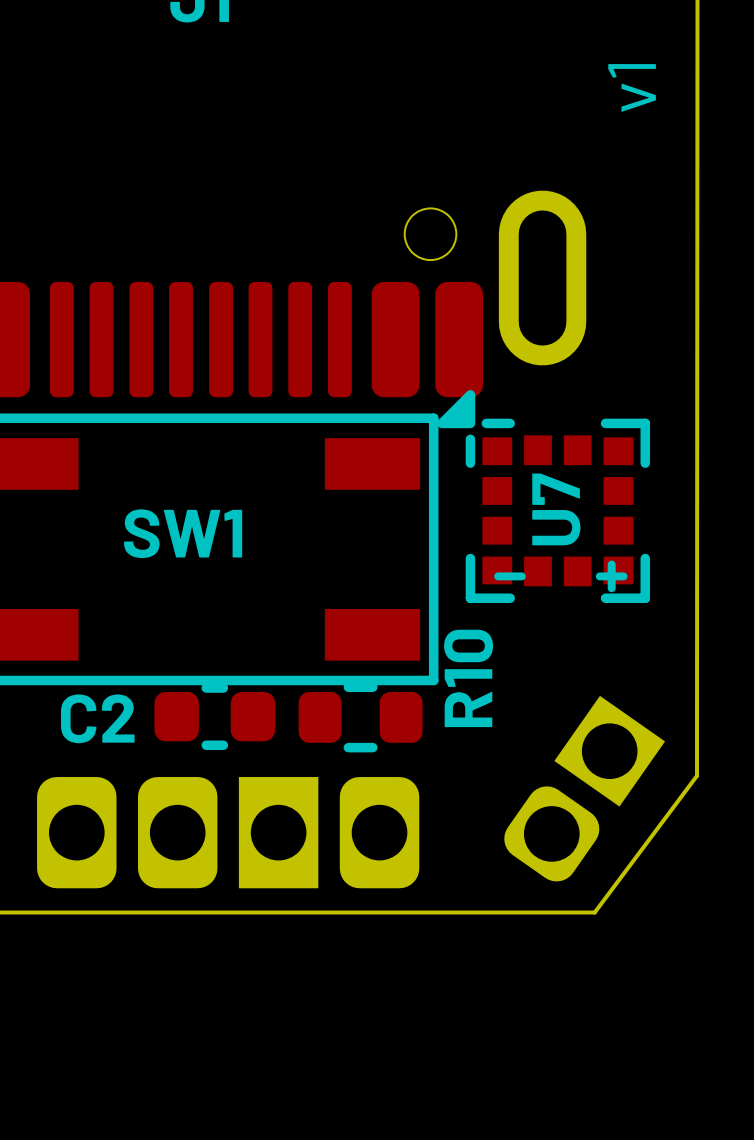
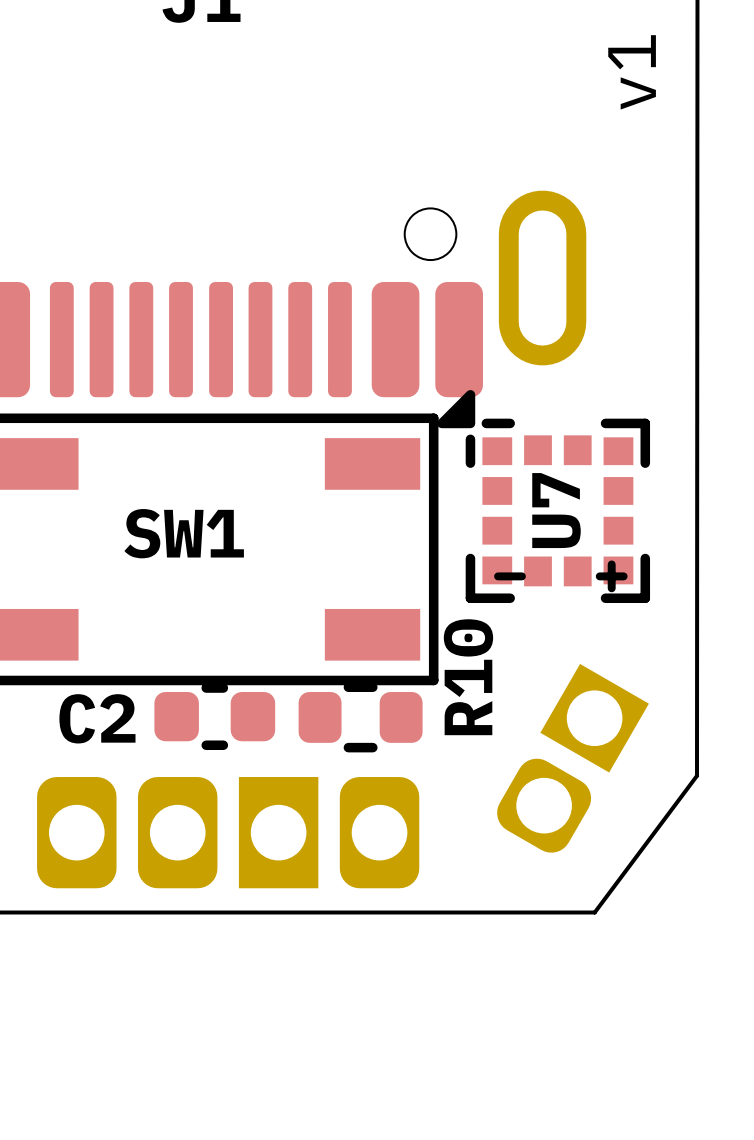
part rotation: 0° (609, 751) -> 5° counterclockwise (594, 718)
part rotation: 0° (551, 833) -> 5° counterclockwise (544, 805)

